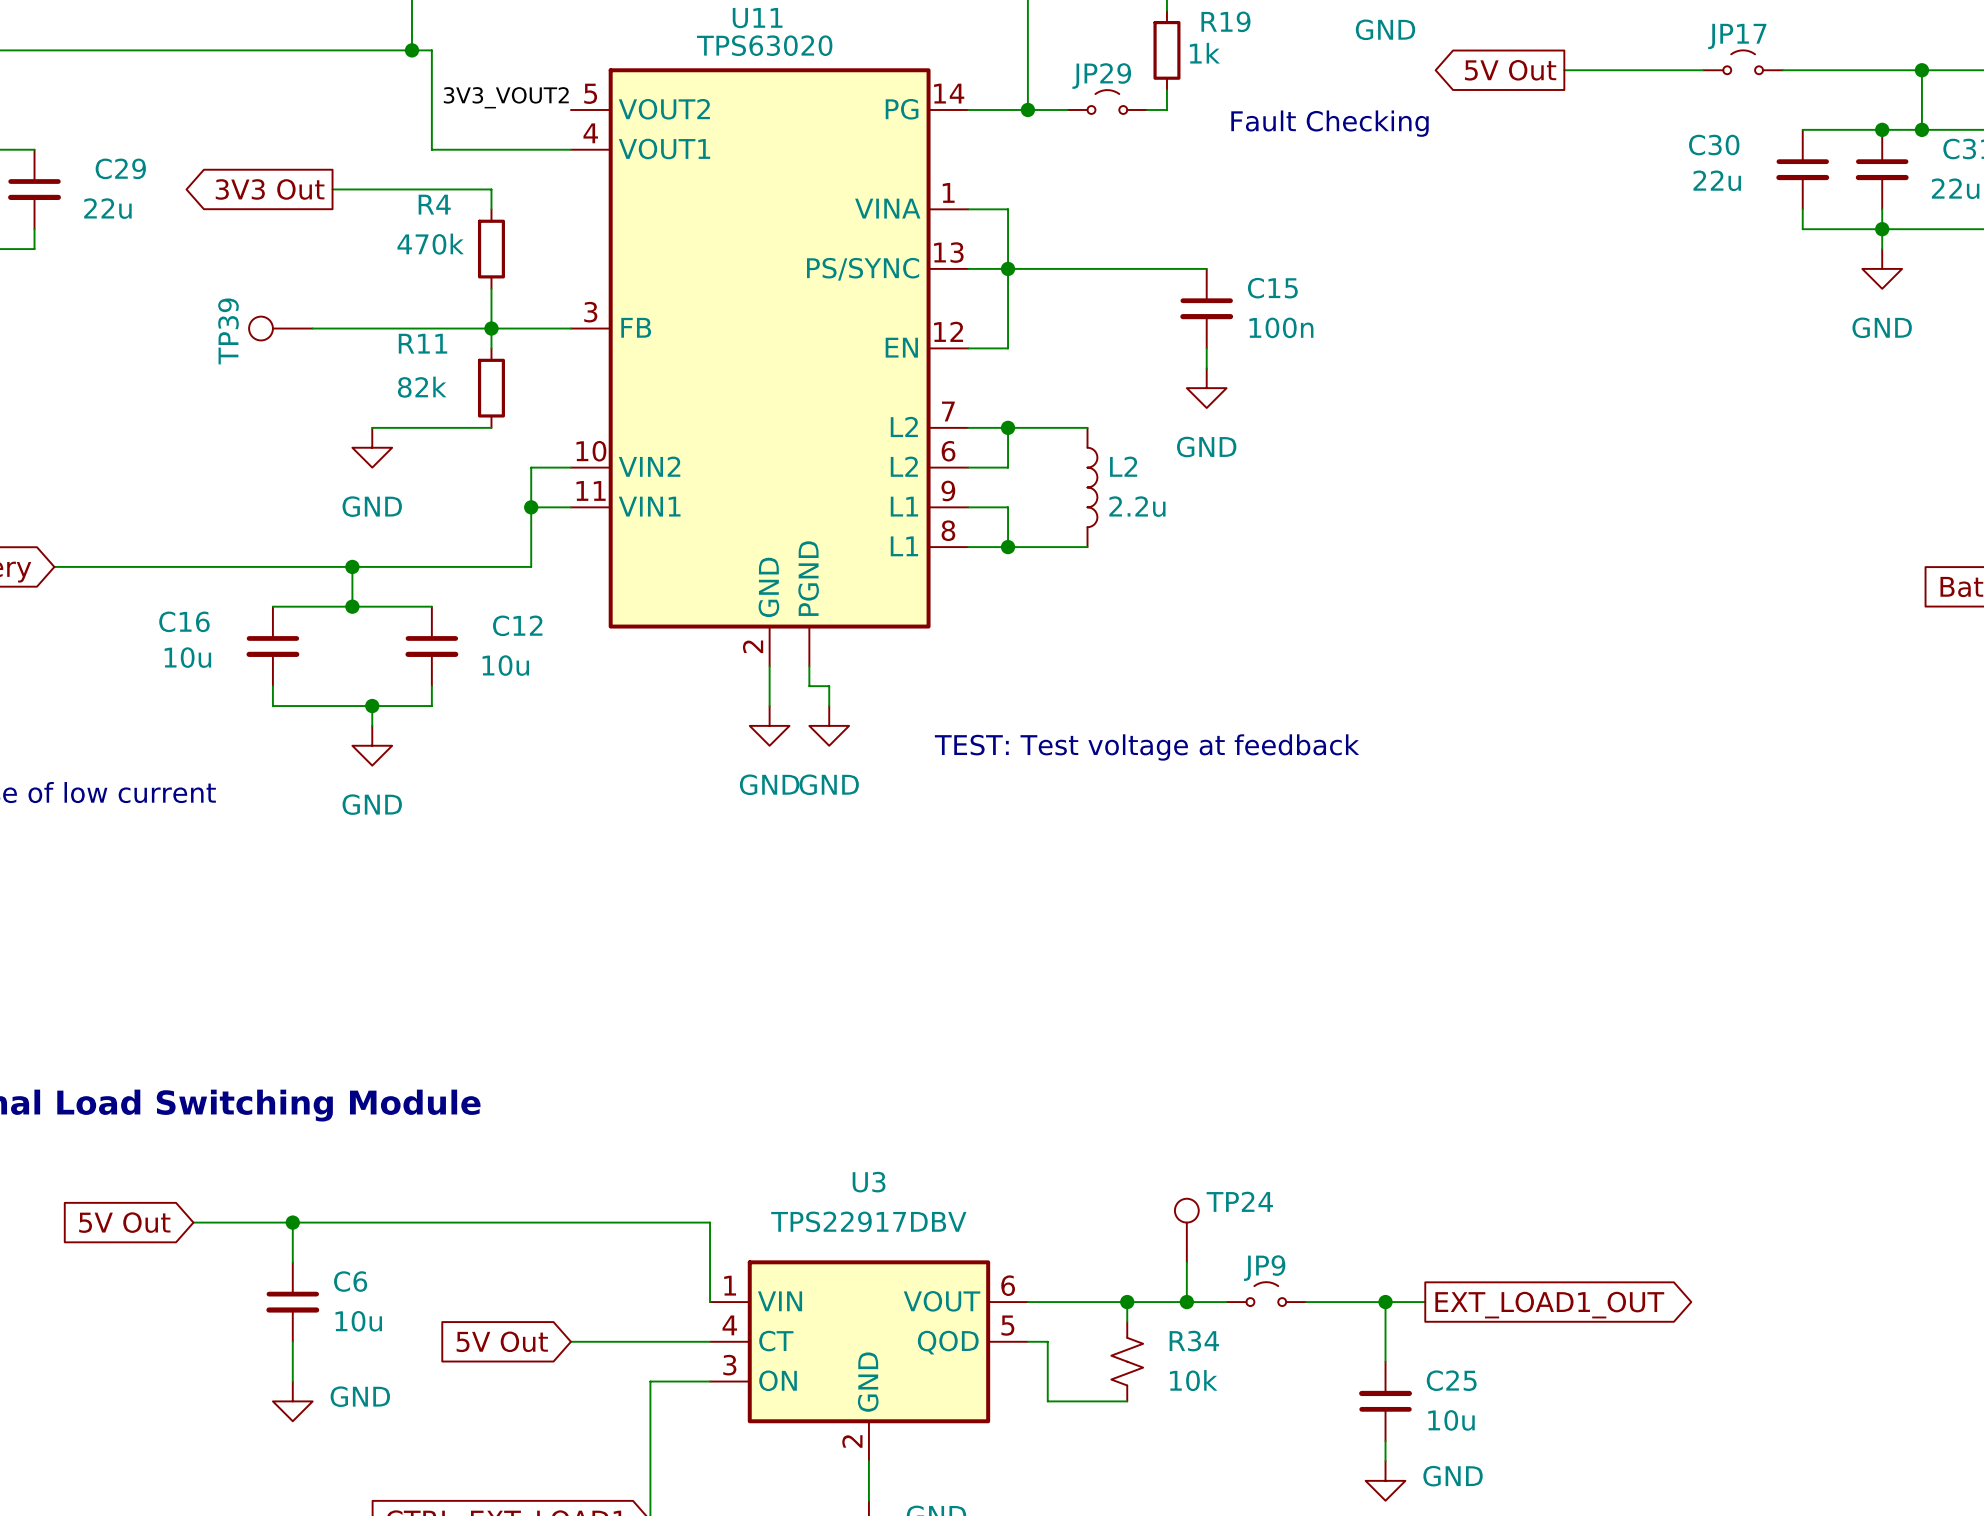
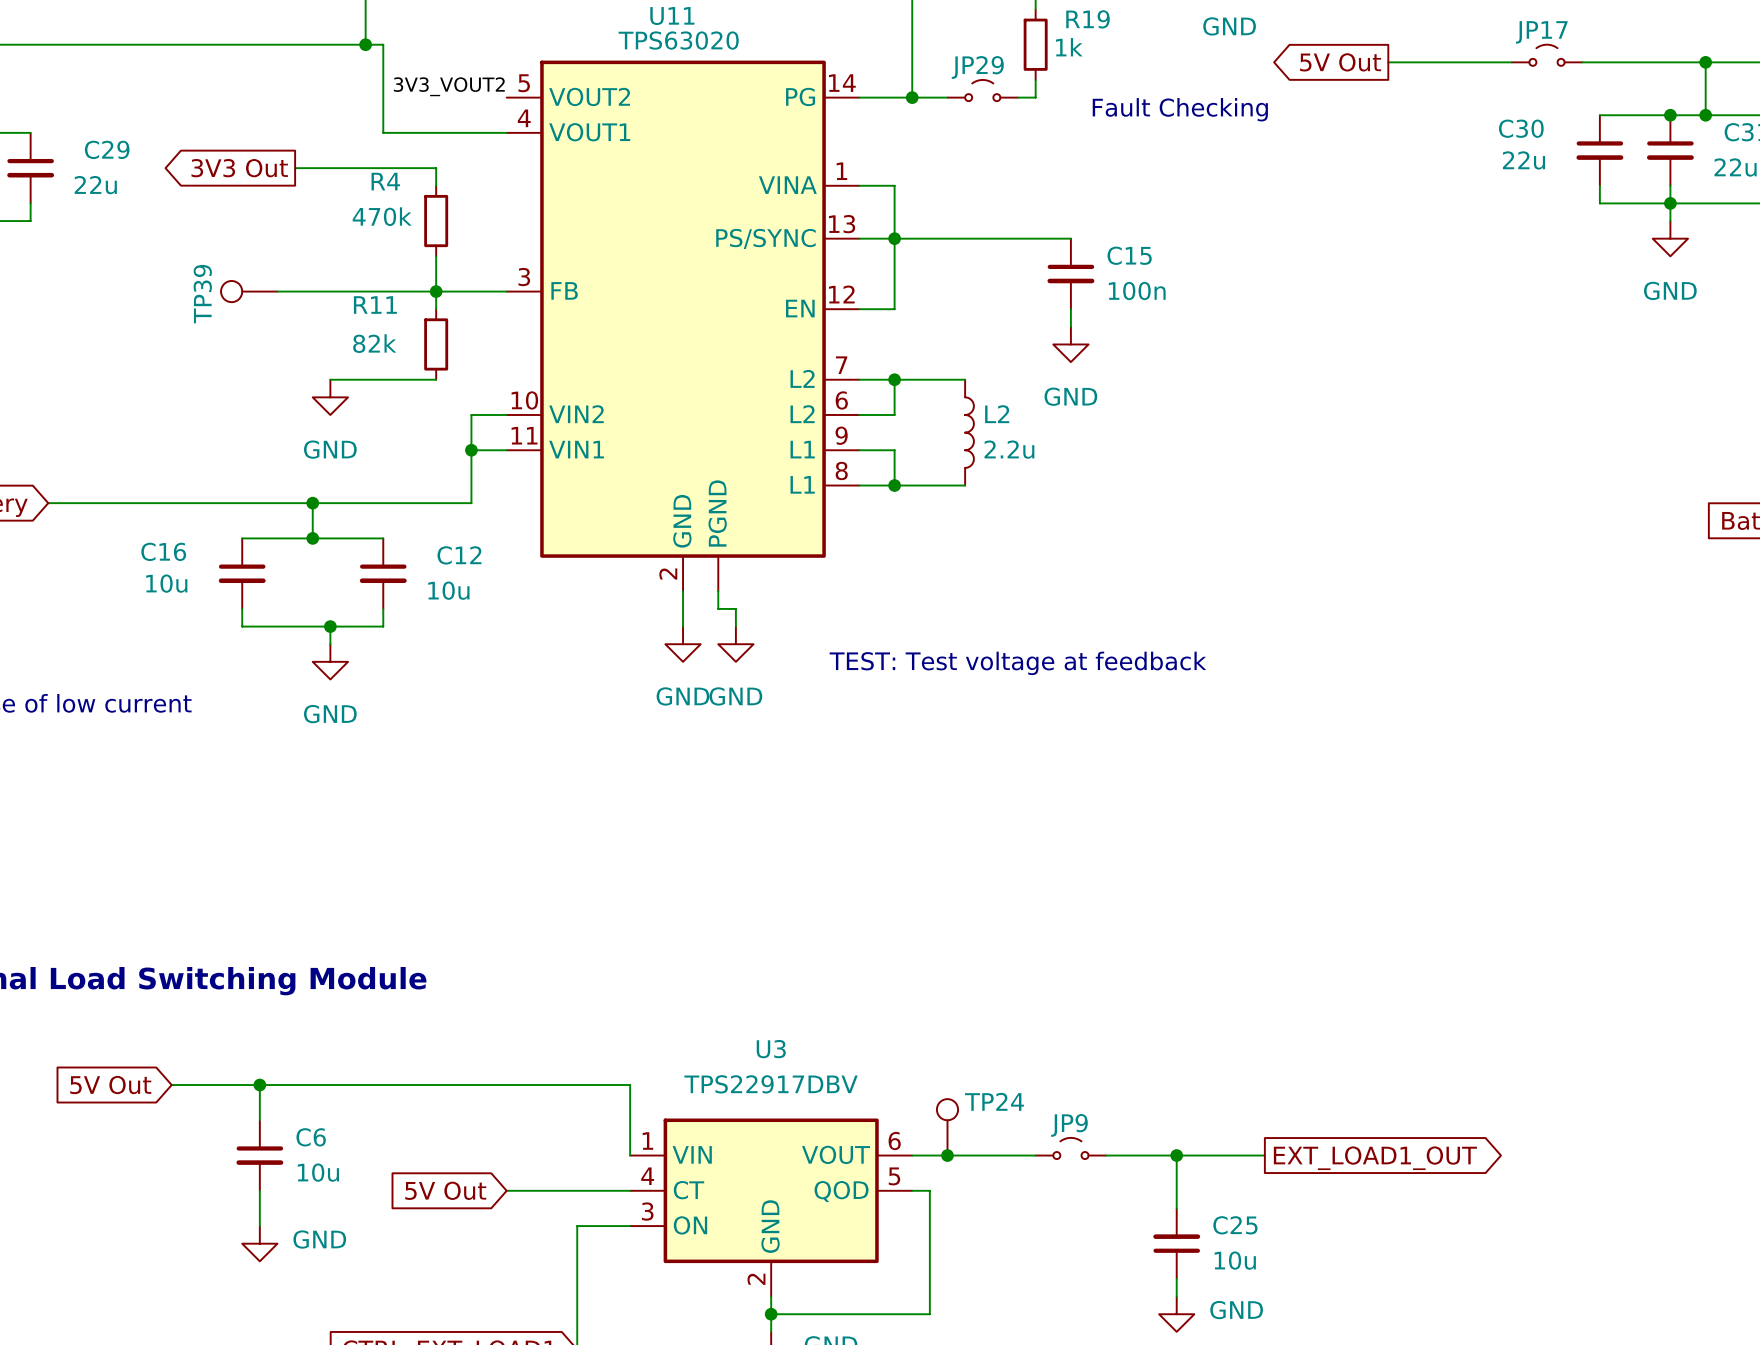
TP24 position: (1186, 1230) -> (947, 1127)
wire: (1186, 1262) (1186, 1302) -> none
JP9 position: (1266, 1294) -> (1070, 1148)
junction: none -> (947, 1155)
wire: (1127, 1302) (1127, 1321) -> none
junction: (1127, 1302) -> none
wire: (1166, 1302) (1226, 1302) -> (1106, 1155) (1159, 1155)
junction: (1186, 1302) -> none
wire: (1385, 1302) (1385, 1361) -> (1176, 1155) (1176, 1208)
junction position: (1385, 1302) -> (1176, 1155)
R34: 10k (1127, 1361) -> none
wire: (1047, 1401) (1127, 1401) -> (929, 1243) (929, 1314) (771, 1314)
C25 position: (1385, 1401) -> (1176, 1243)
wire: (1385, 1441) (1385, 1461) -> (1176, 1278) (1176, 1296)
junction: none -> (771, 1314)
power symbol position: GND (1385, 1480) -> GND (1176, 1314)

